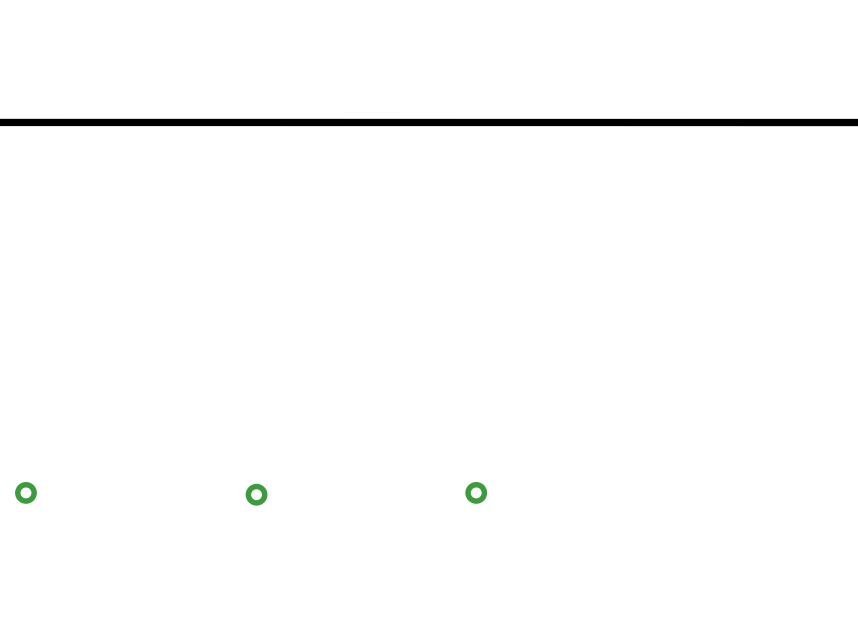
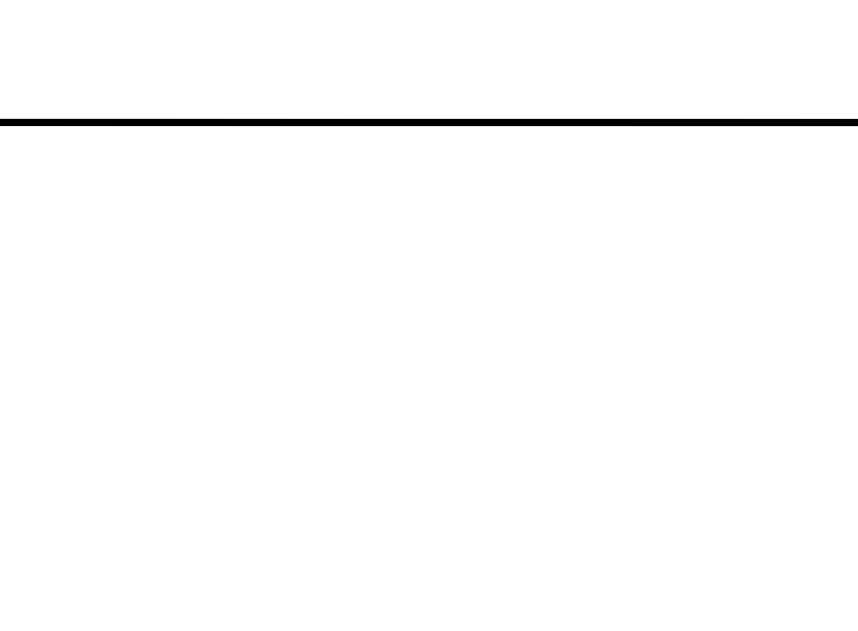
via: (25, 492) -> none
via: (476, 492) -> none
via: (256, 494) -> none

